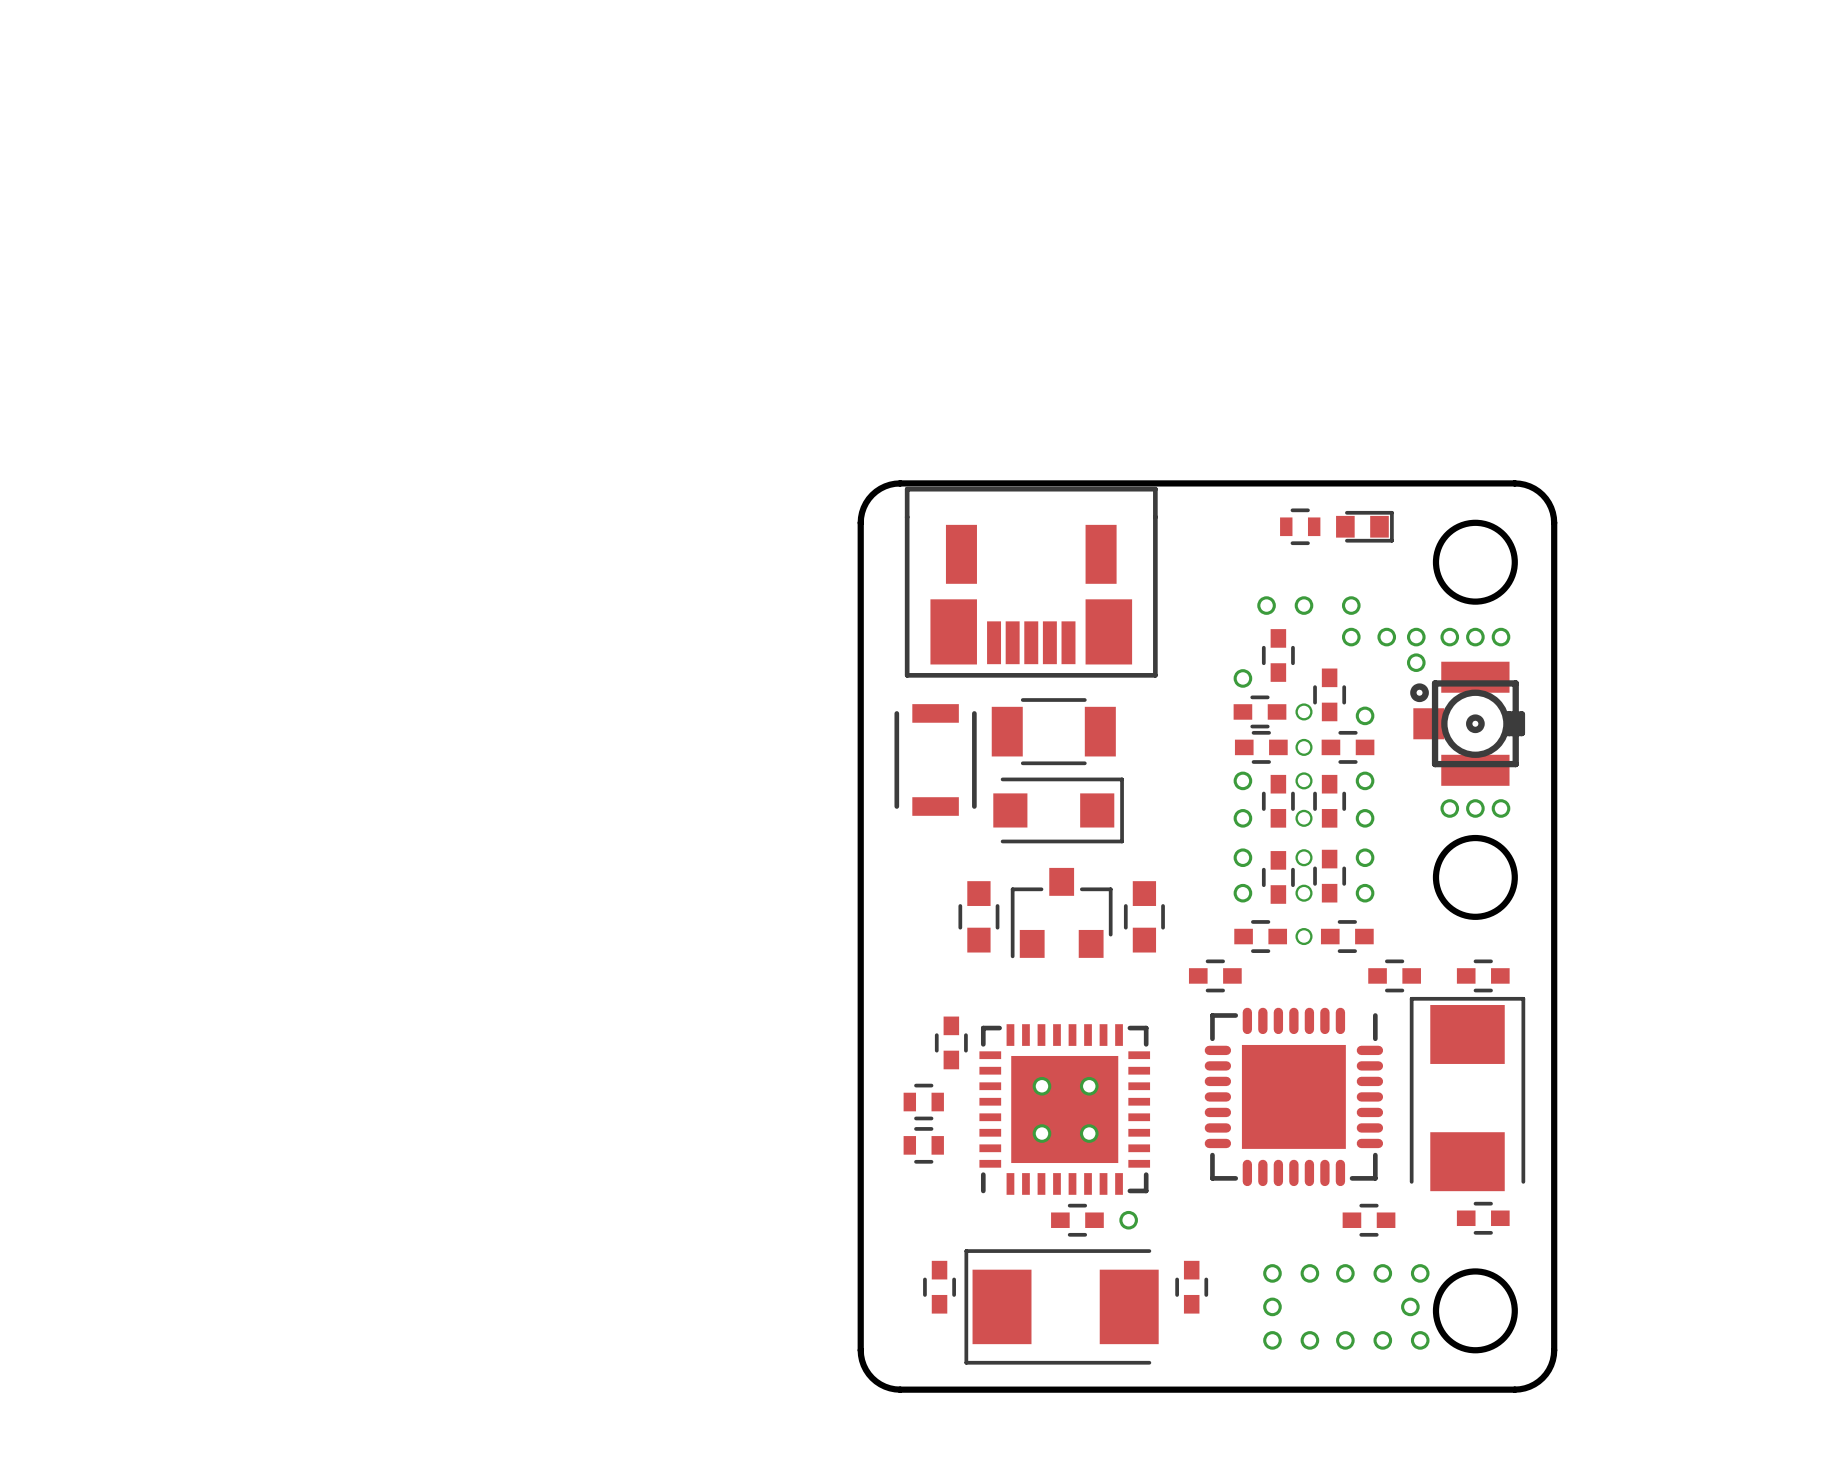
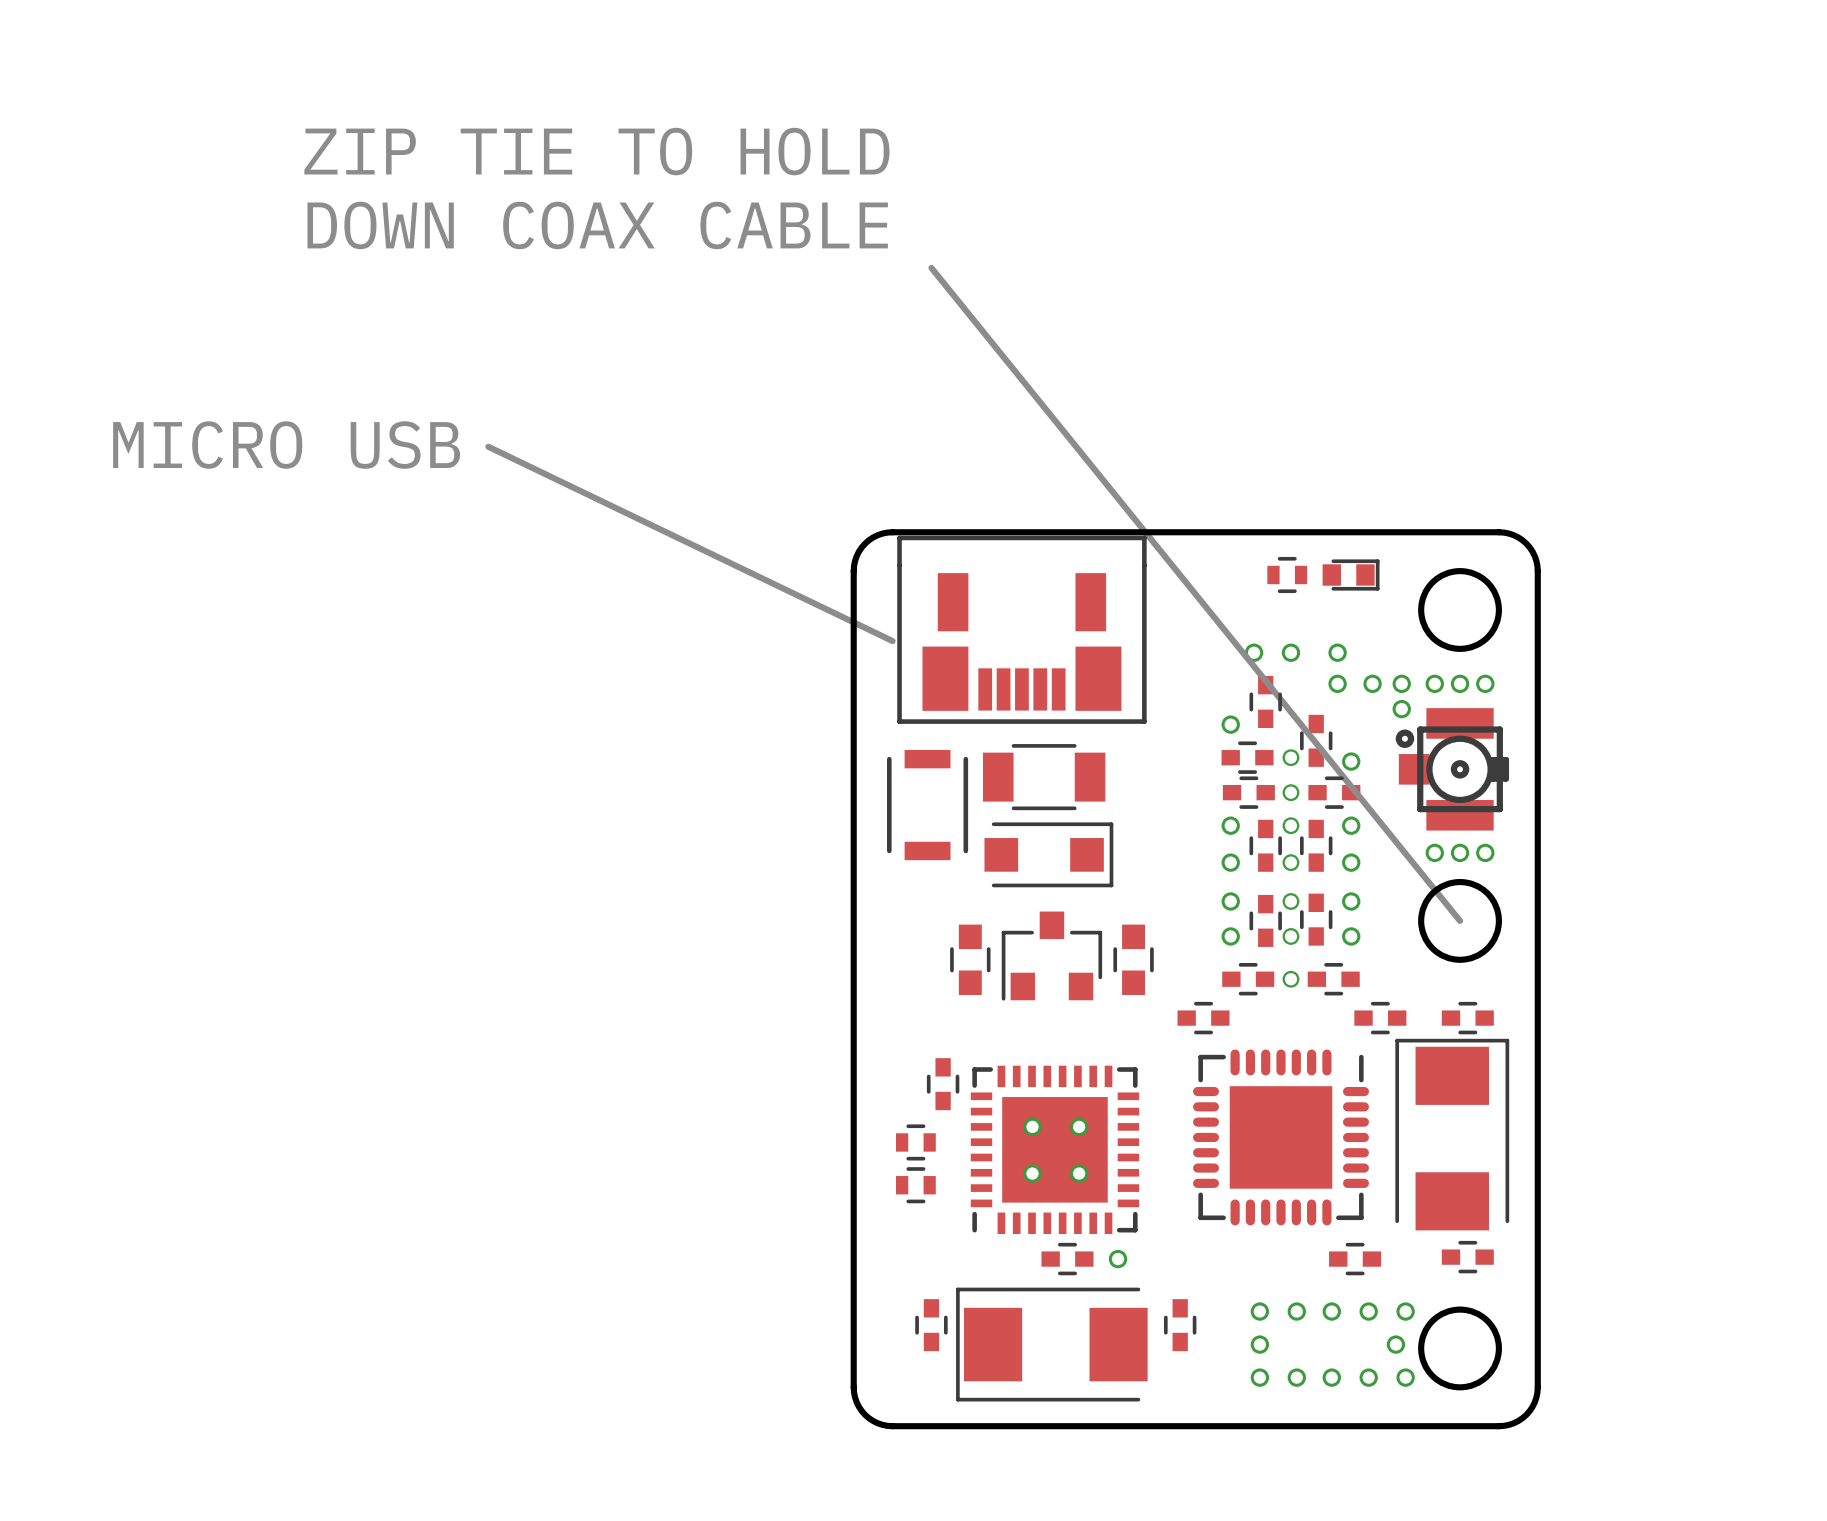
text: none -> ZIP TIE TO HOLD (596, 151)
text: none -> DOWN COAX CABLE (597, 225)
line: none -> (931, 267) (1460, 920)
text: none -> MICRO USB (286, 445)
line: none -> (488, 446) (892, 641)

